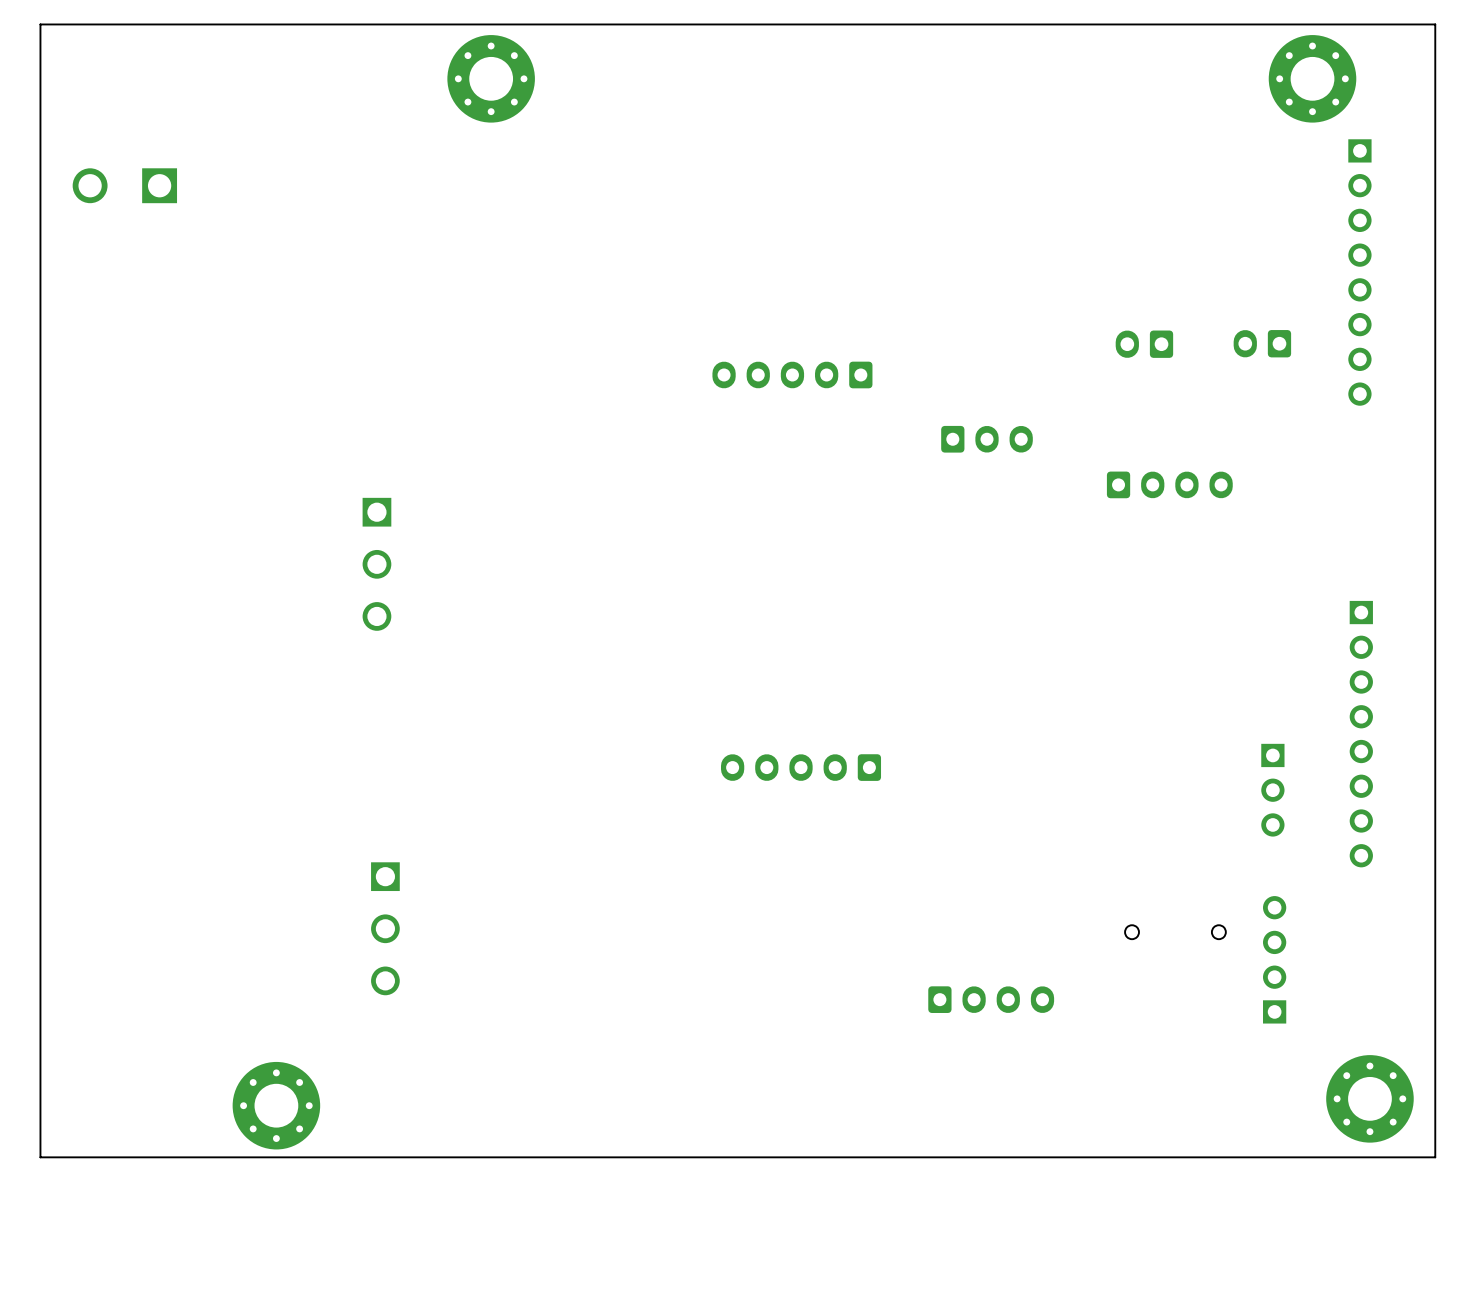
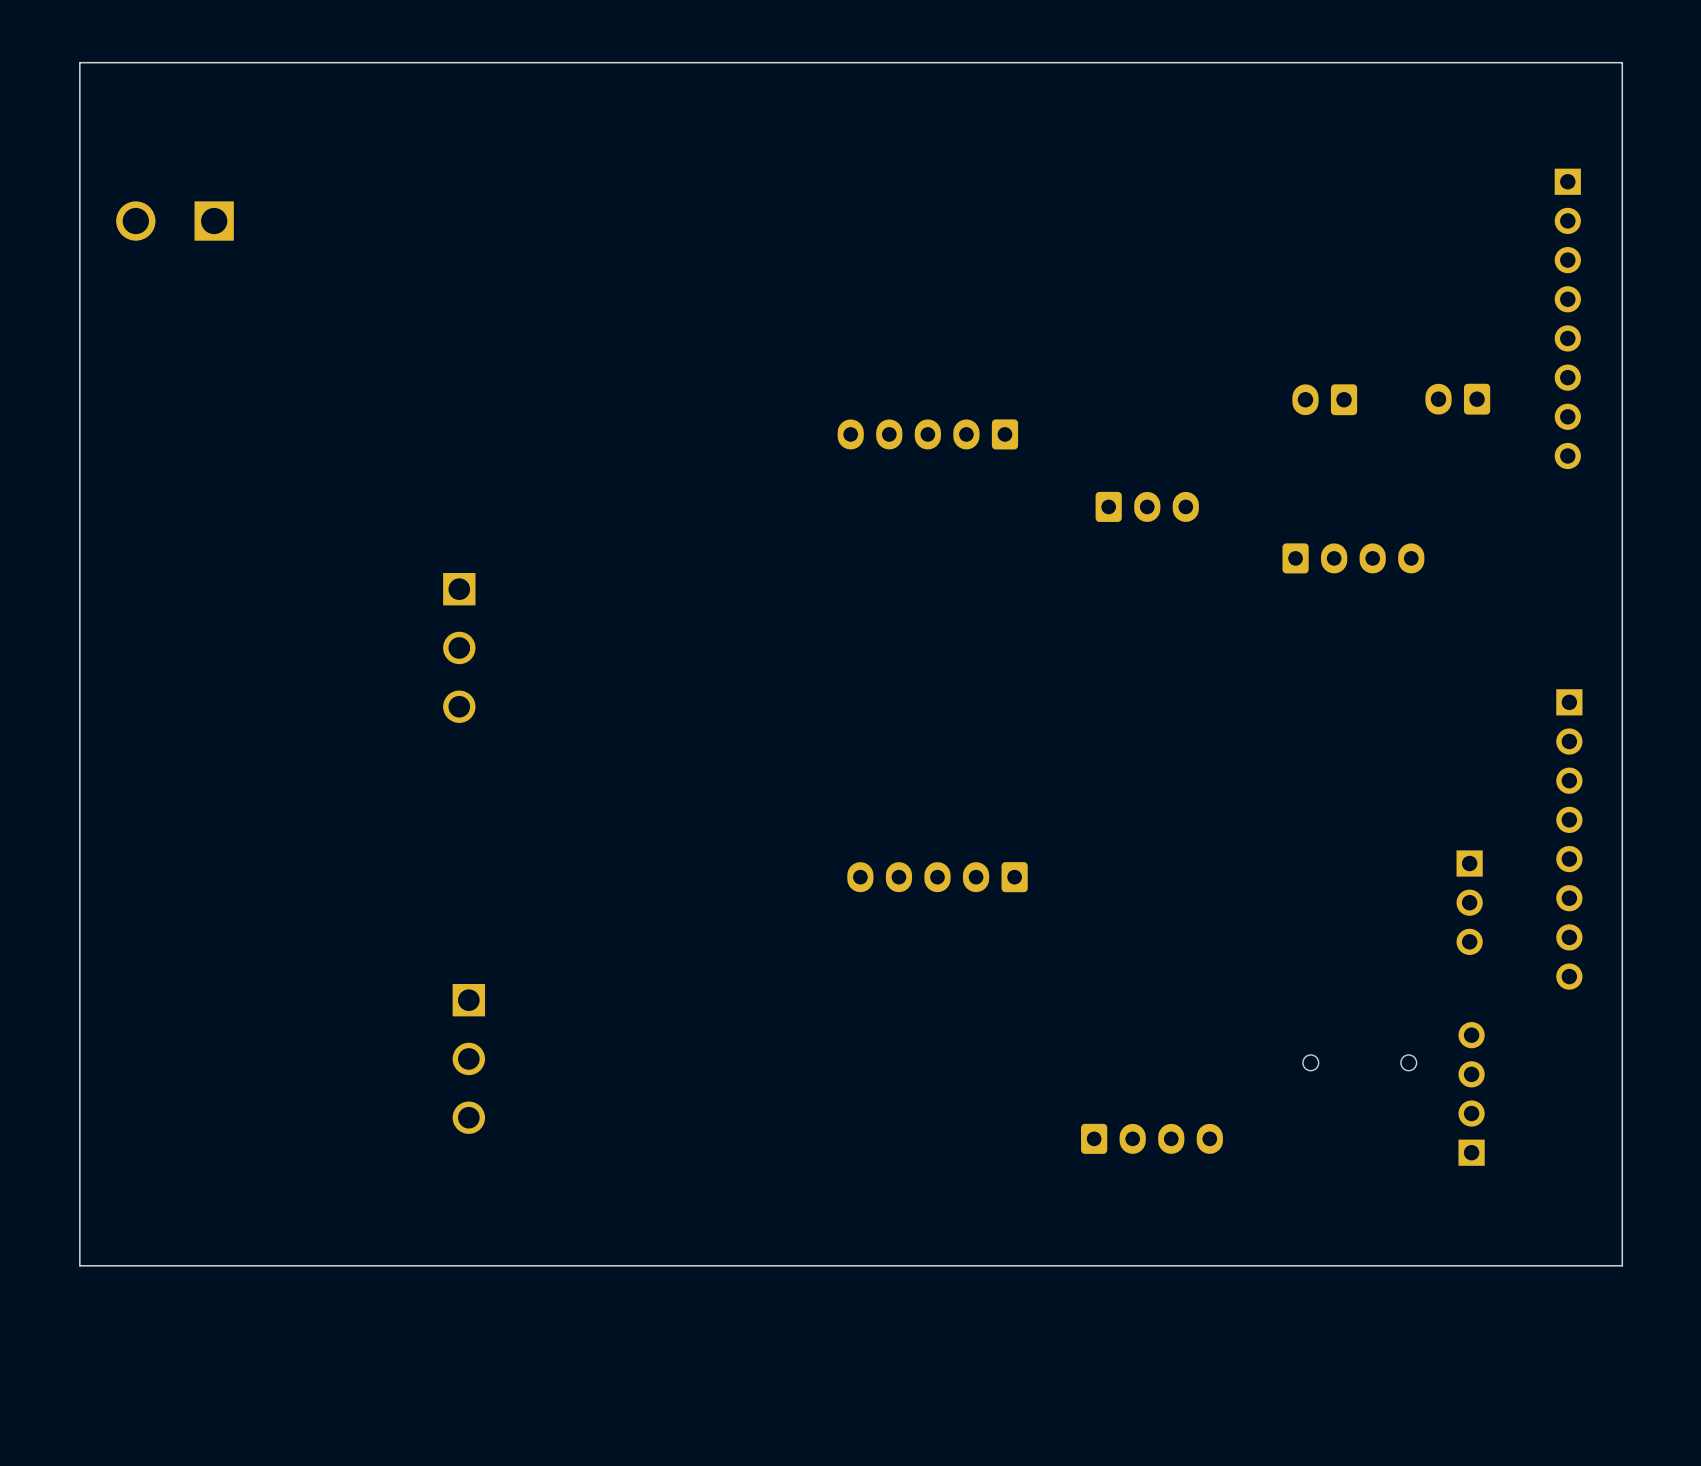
board edge: (40, 45) (40, 24) (1435, 24) (1435, 1157) (40, 1157) (40, 1112) -> (79, 62) (1622, 62) (1622, 1265) (79, 1265)
part: (491, 78) -> none
part: (1312, 78) -> none
part: (1369, 1098) -> none
part: (276, 1105) -> none

